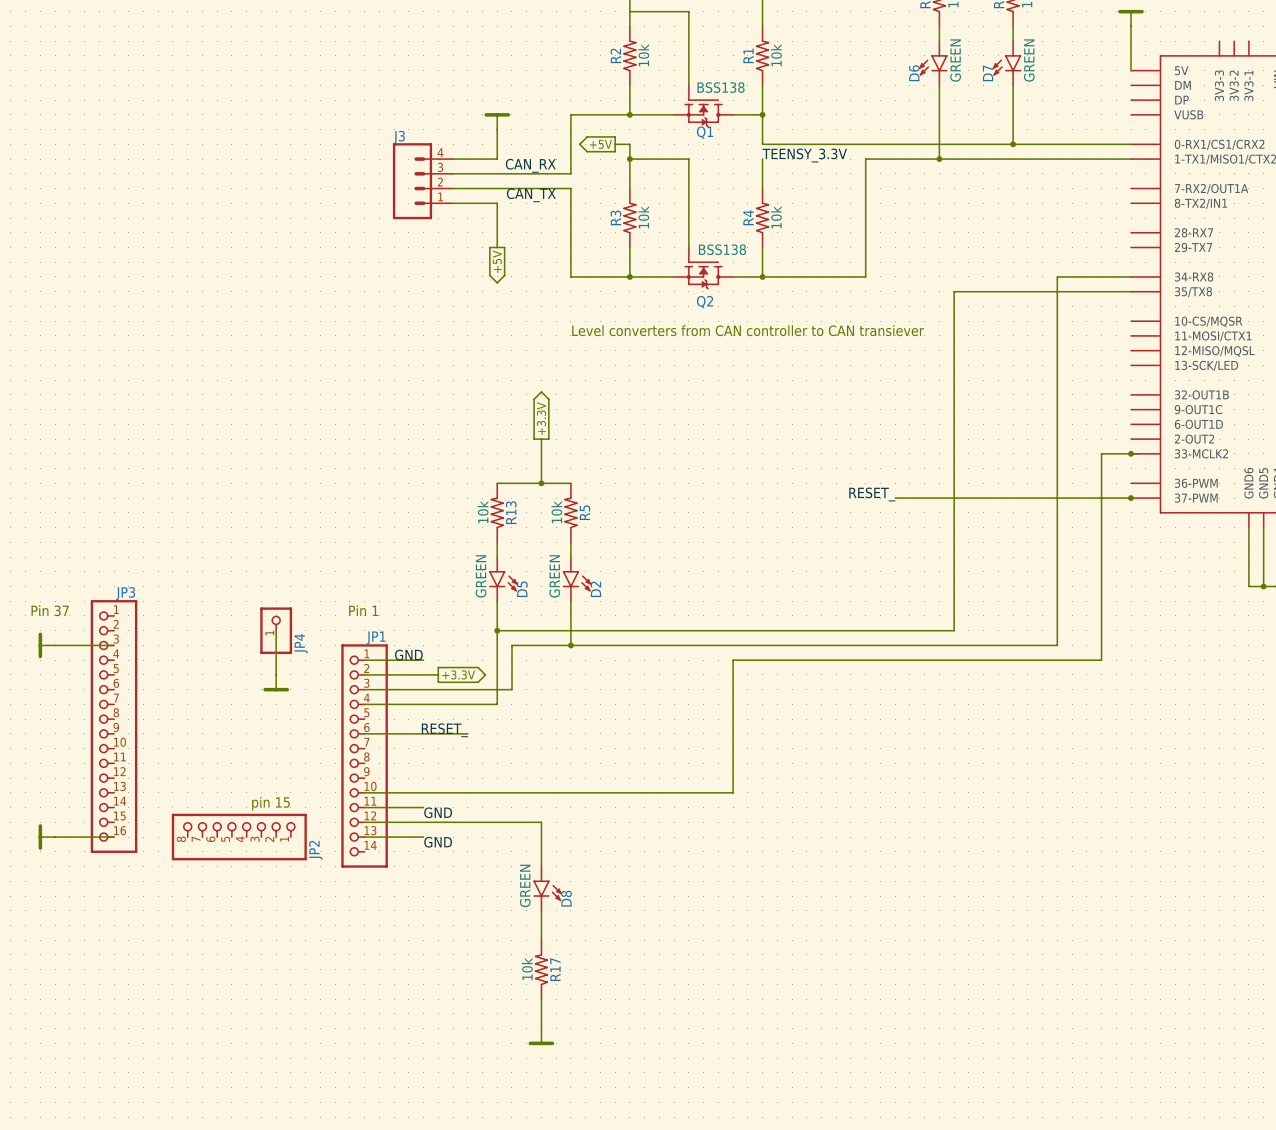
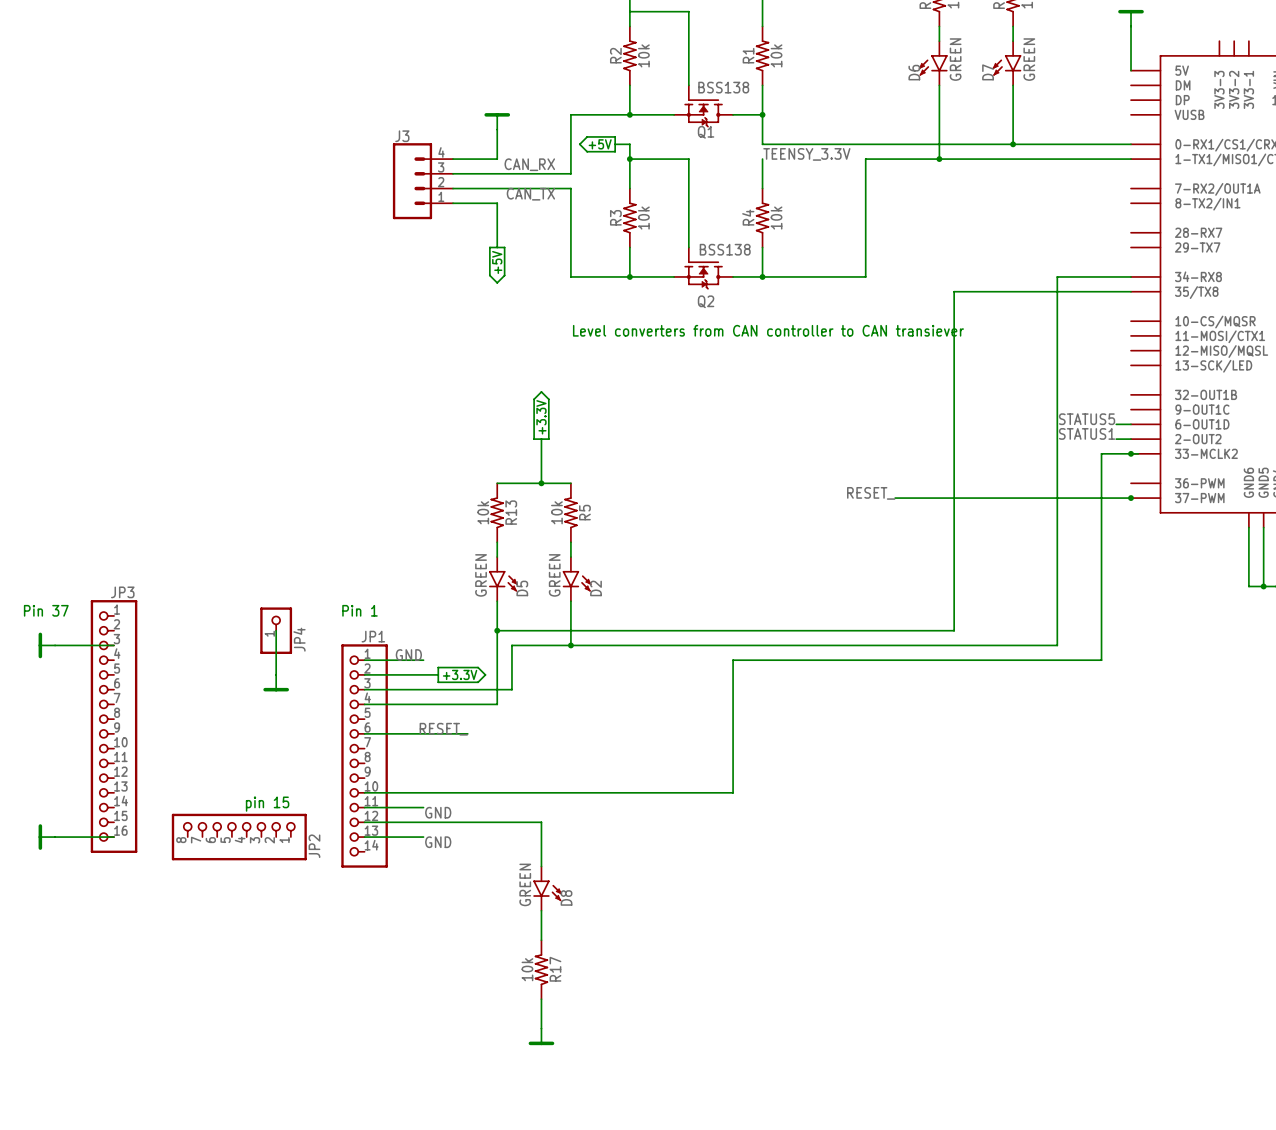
label: none -> STATUS5 (1087, 419)
wire: none -> (1116, 424) (1131, 424)
label: none -> STATUS1 (1087, 433)
wire: none -> (1116, 439) (1131, 439)

